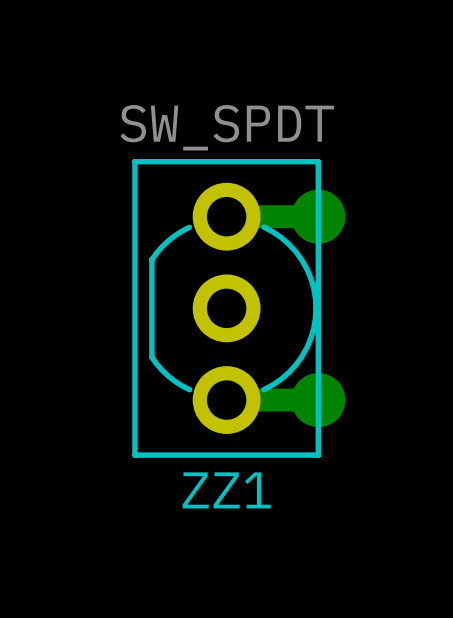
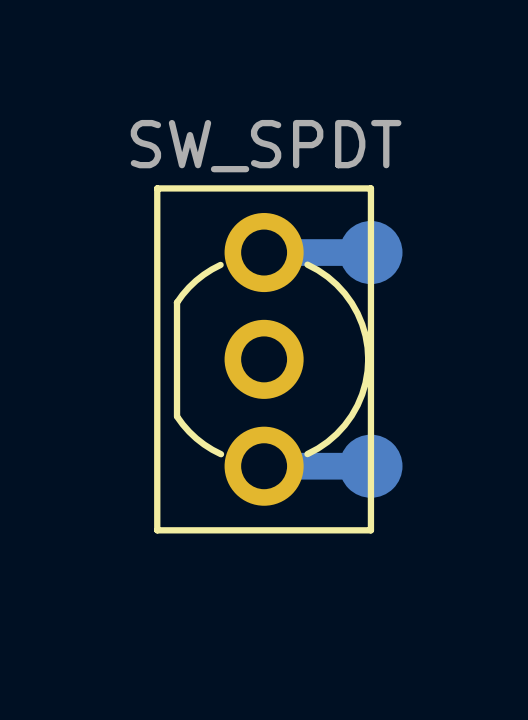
ZZ1 name: ZZ1 (226, 490) -> none

